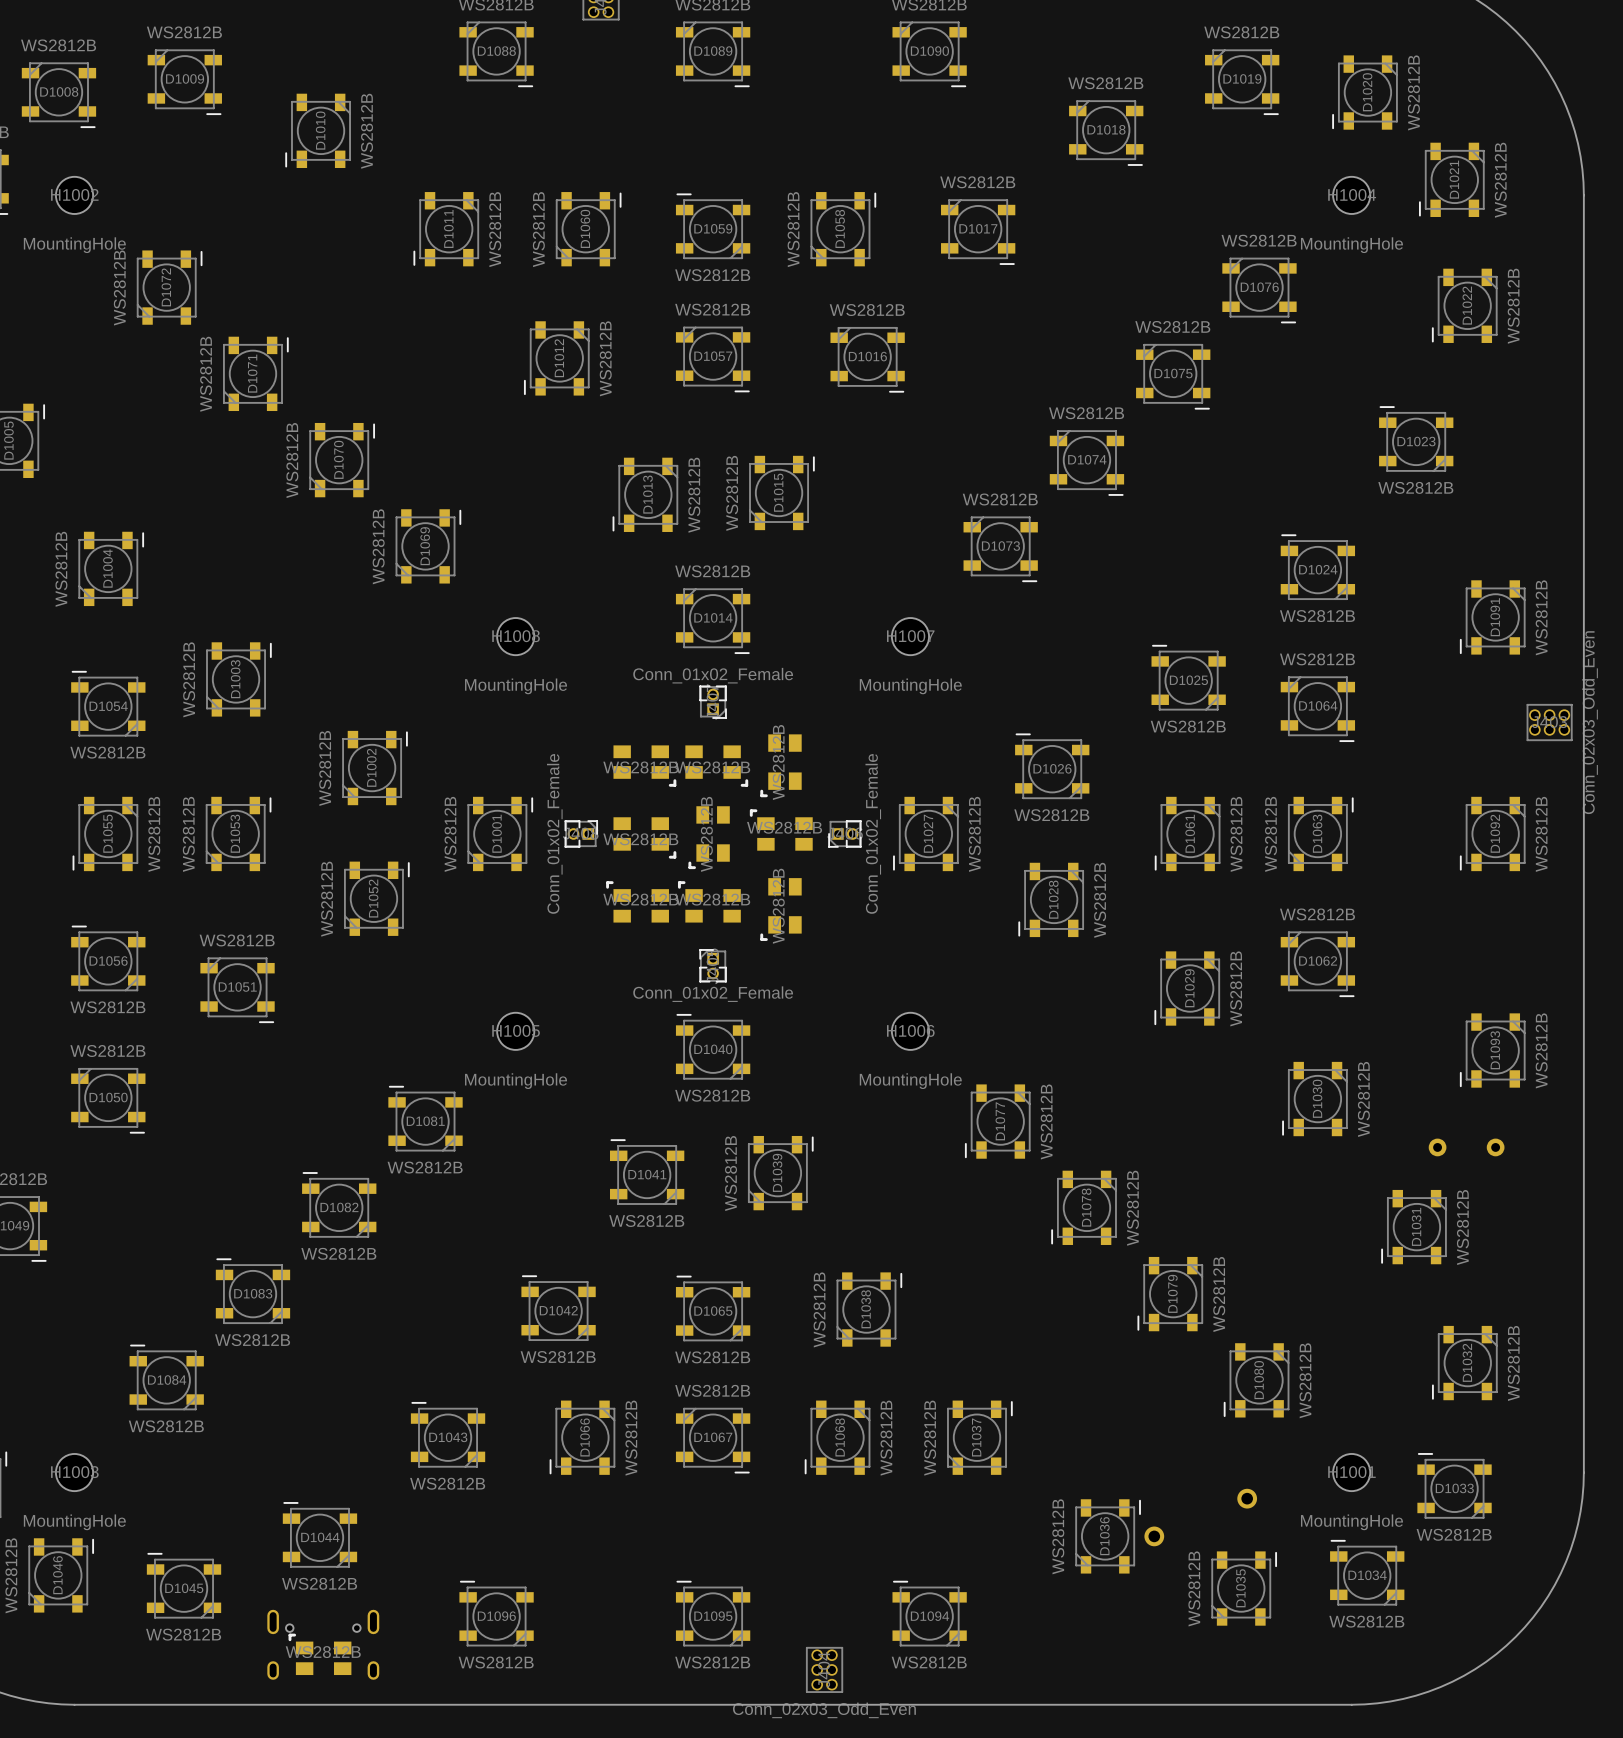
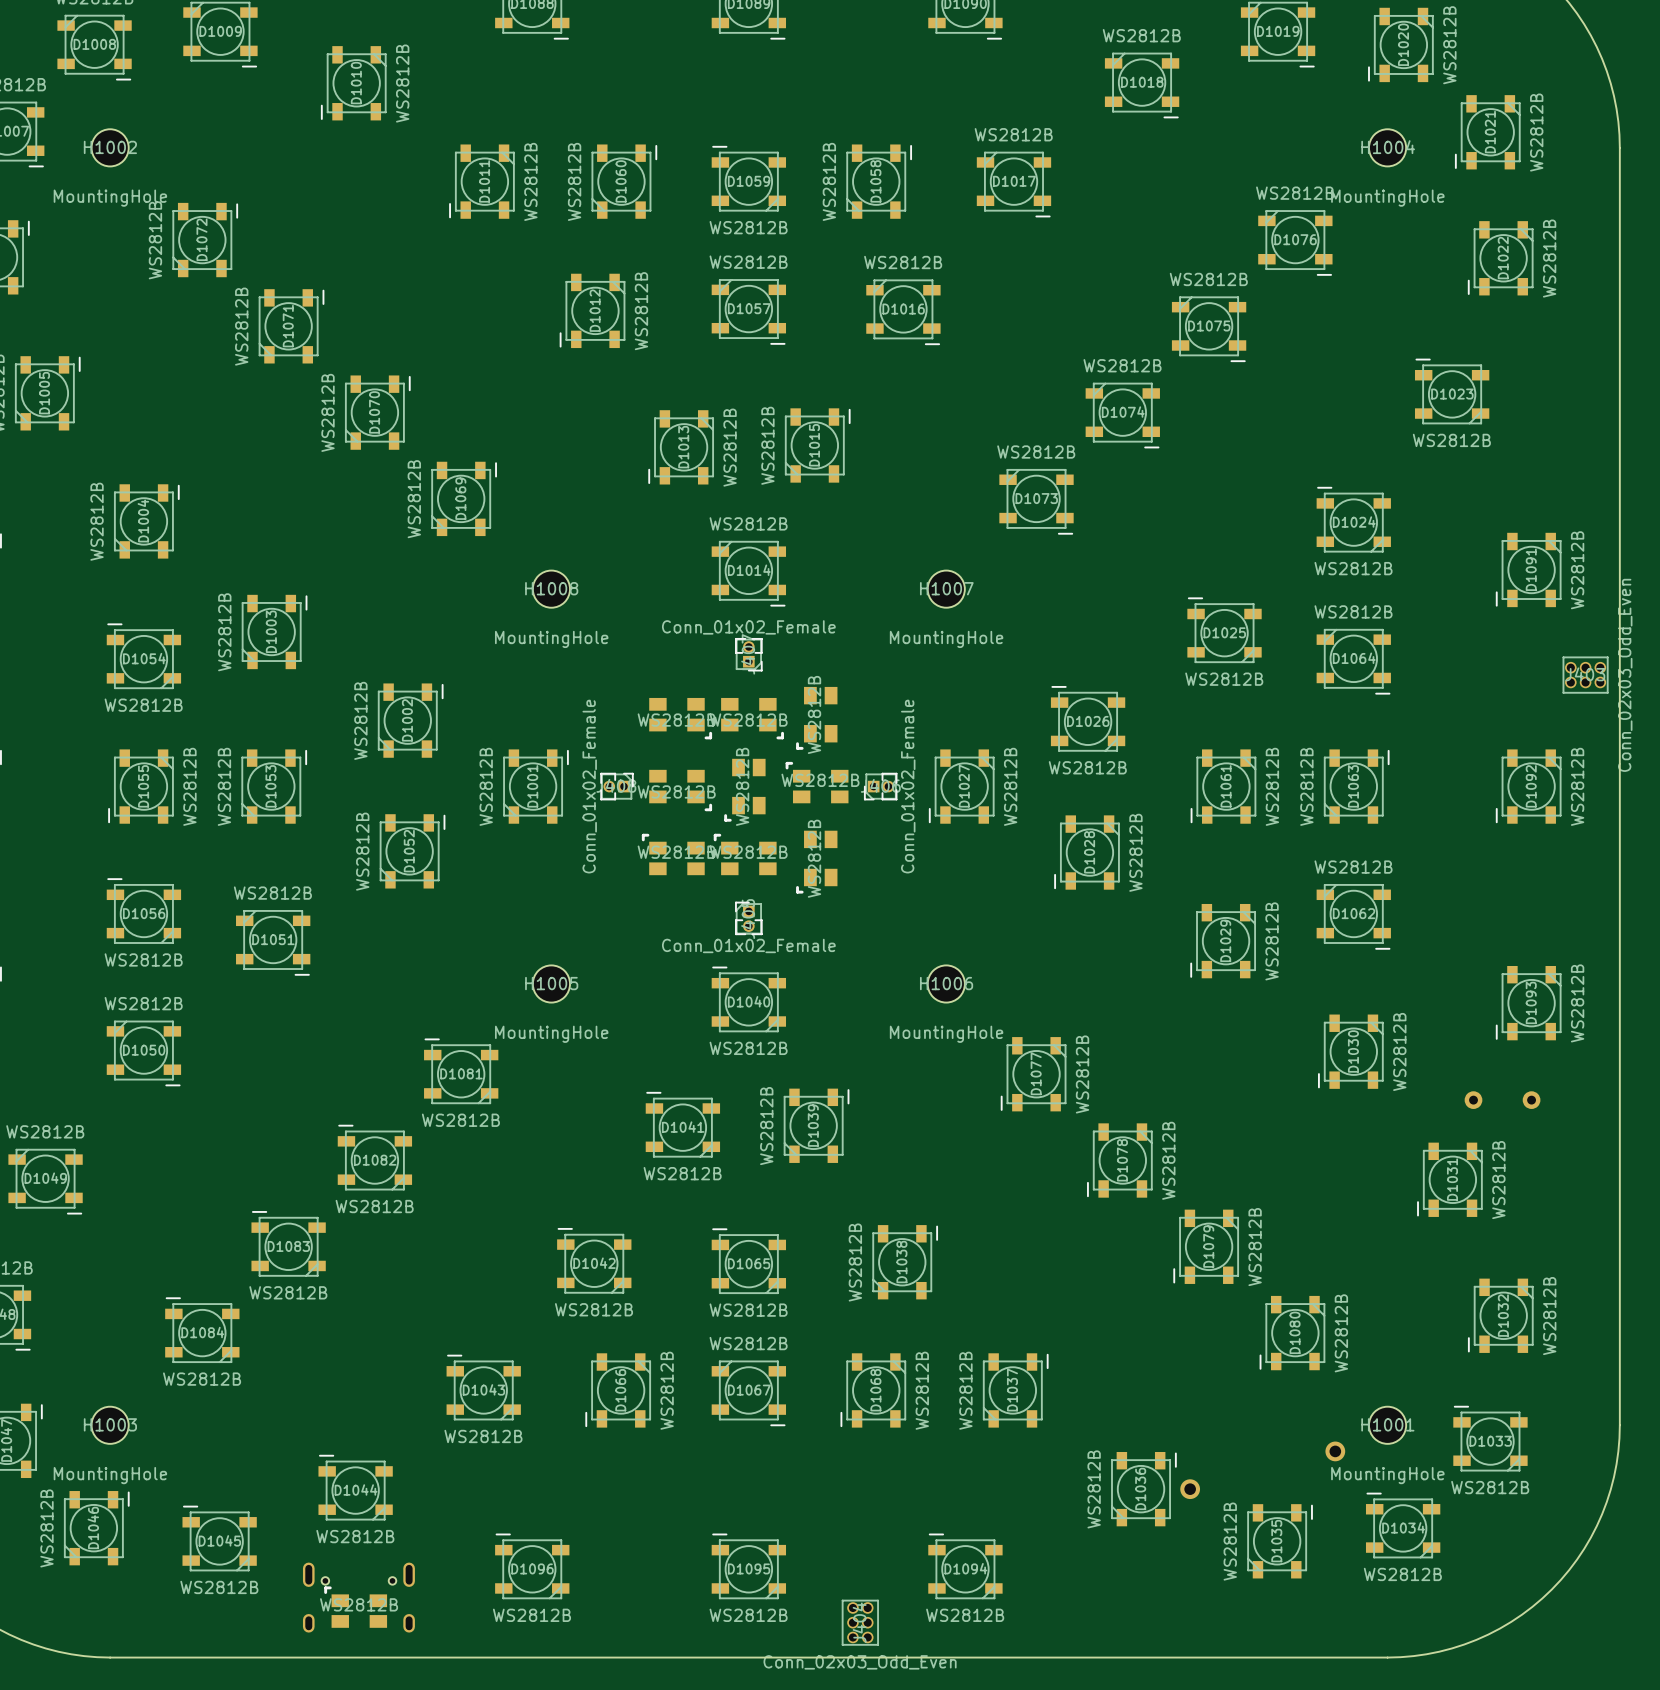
part position: (1247, 1498) -> (1335, 1451)

